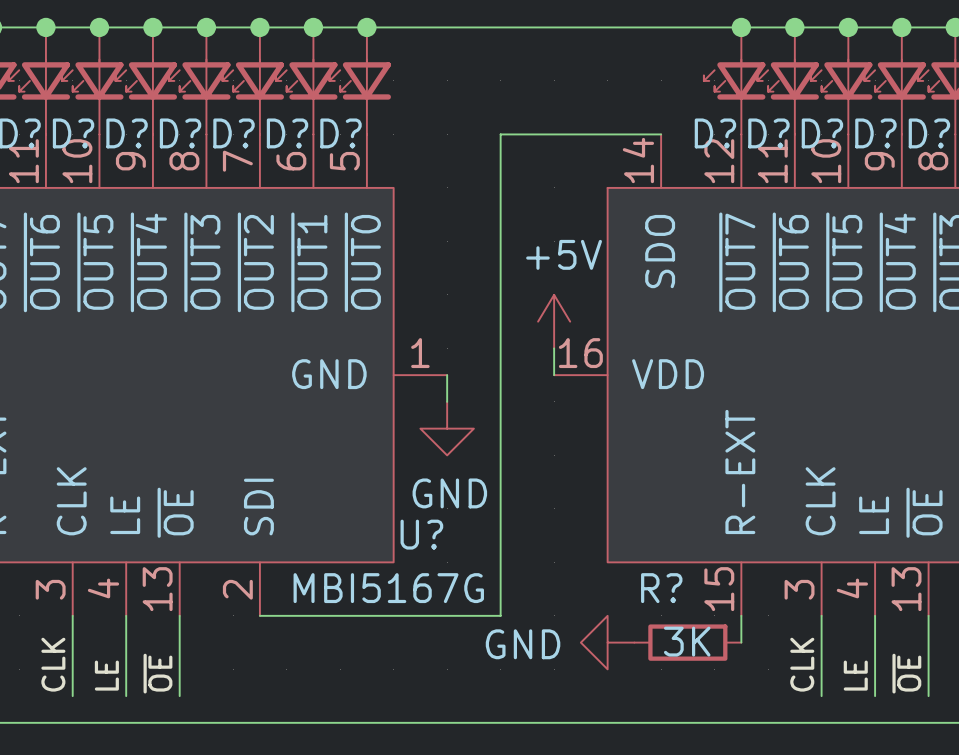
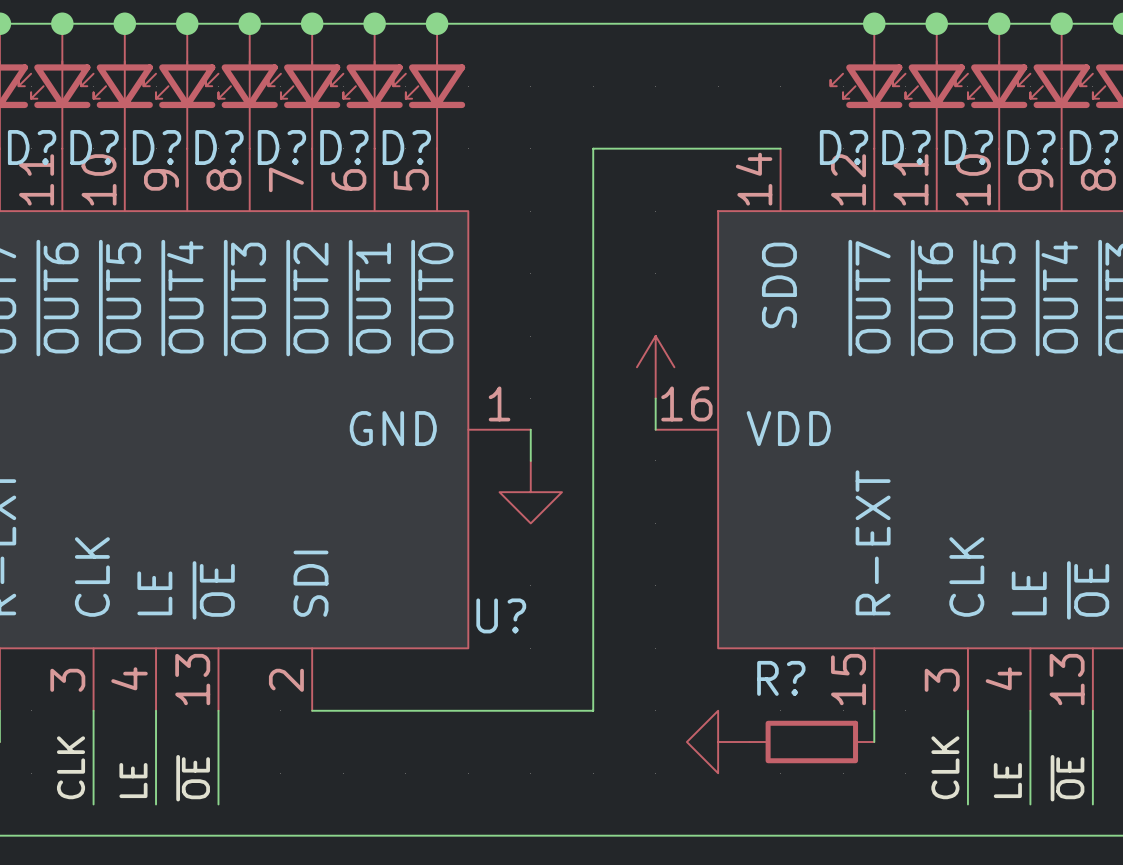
power symbol text: +5V (564, 254) -> none
power symbol text: GND (449, 493) -> none
U? value: MBI5167G (388, 588) -> none
R? value: 3K (687, 641) -> none
power symbol text: GND (523, 644) -> none

